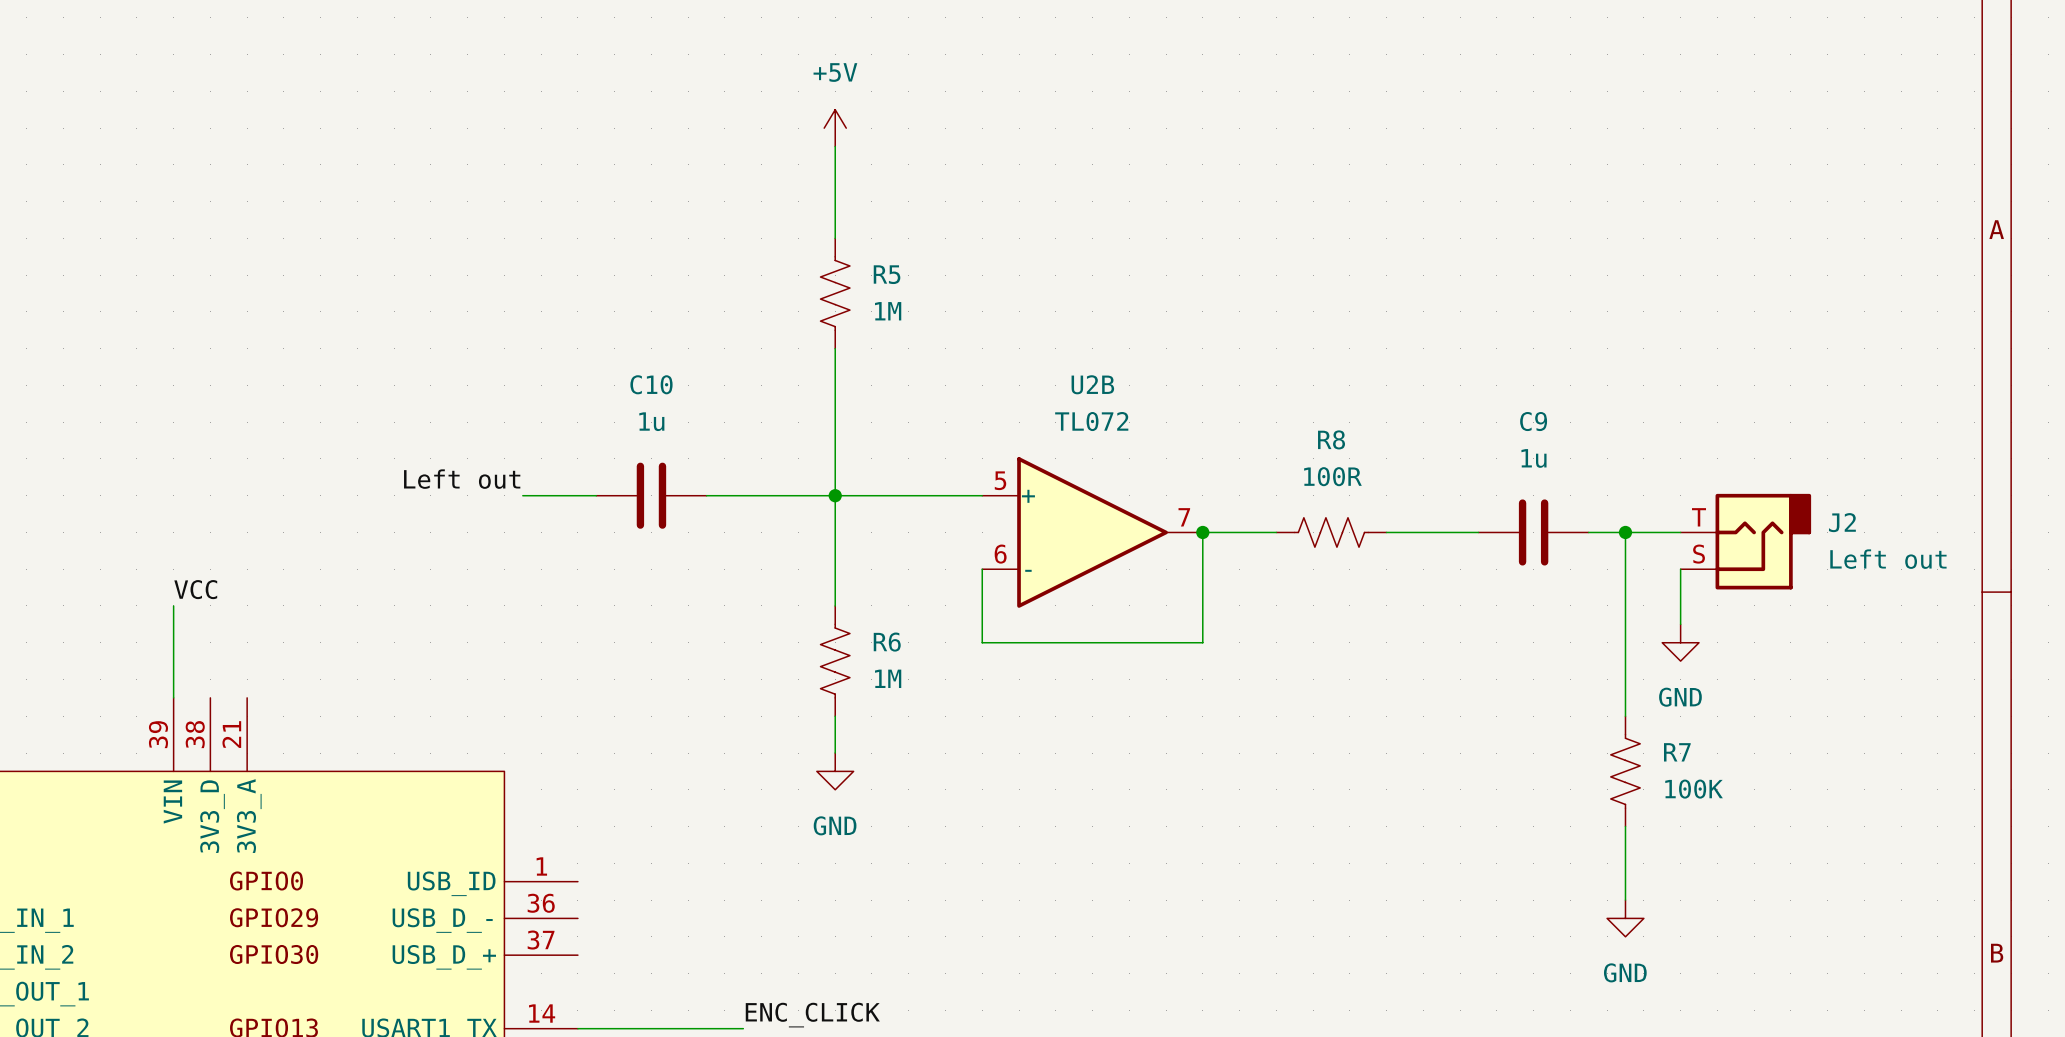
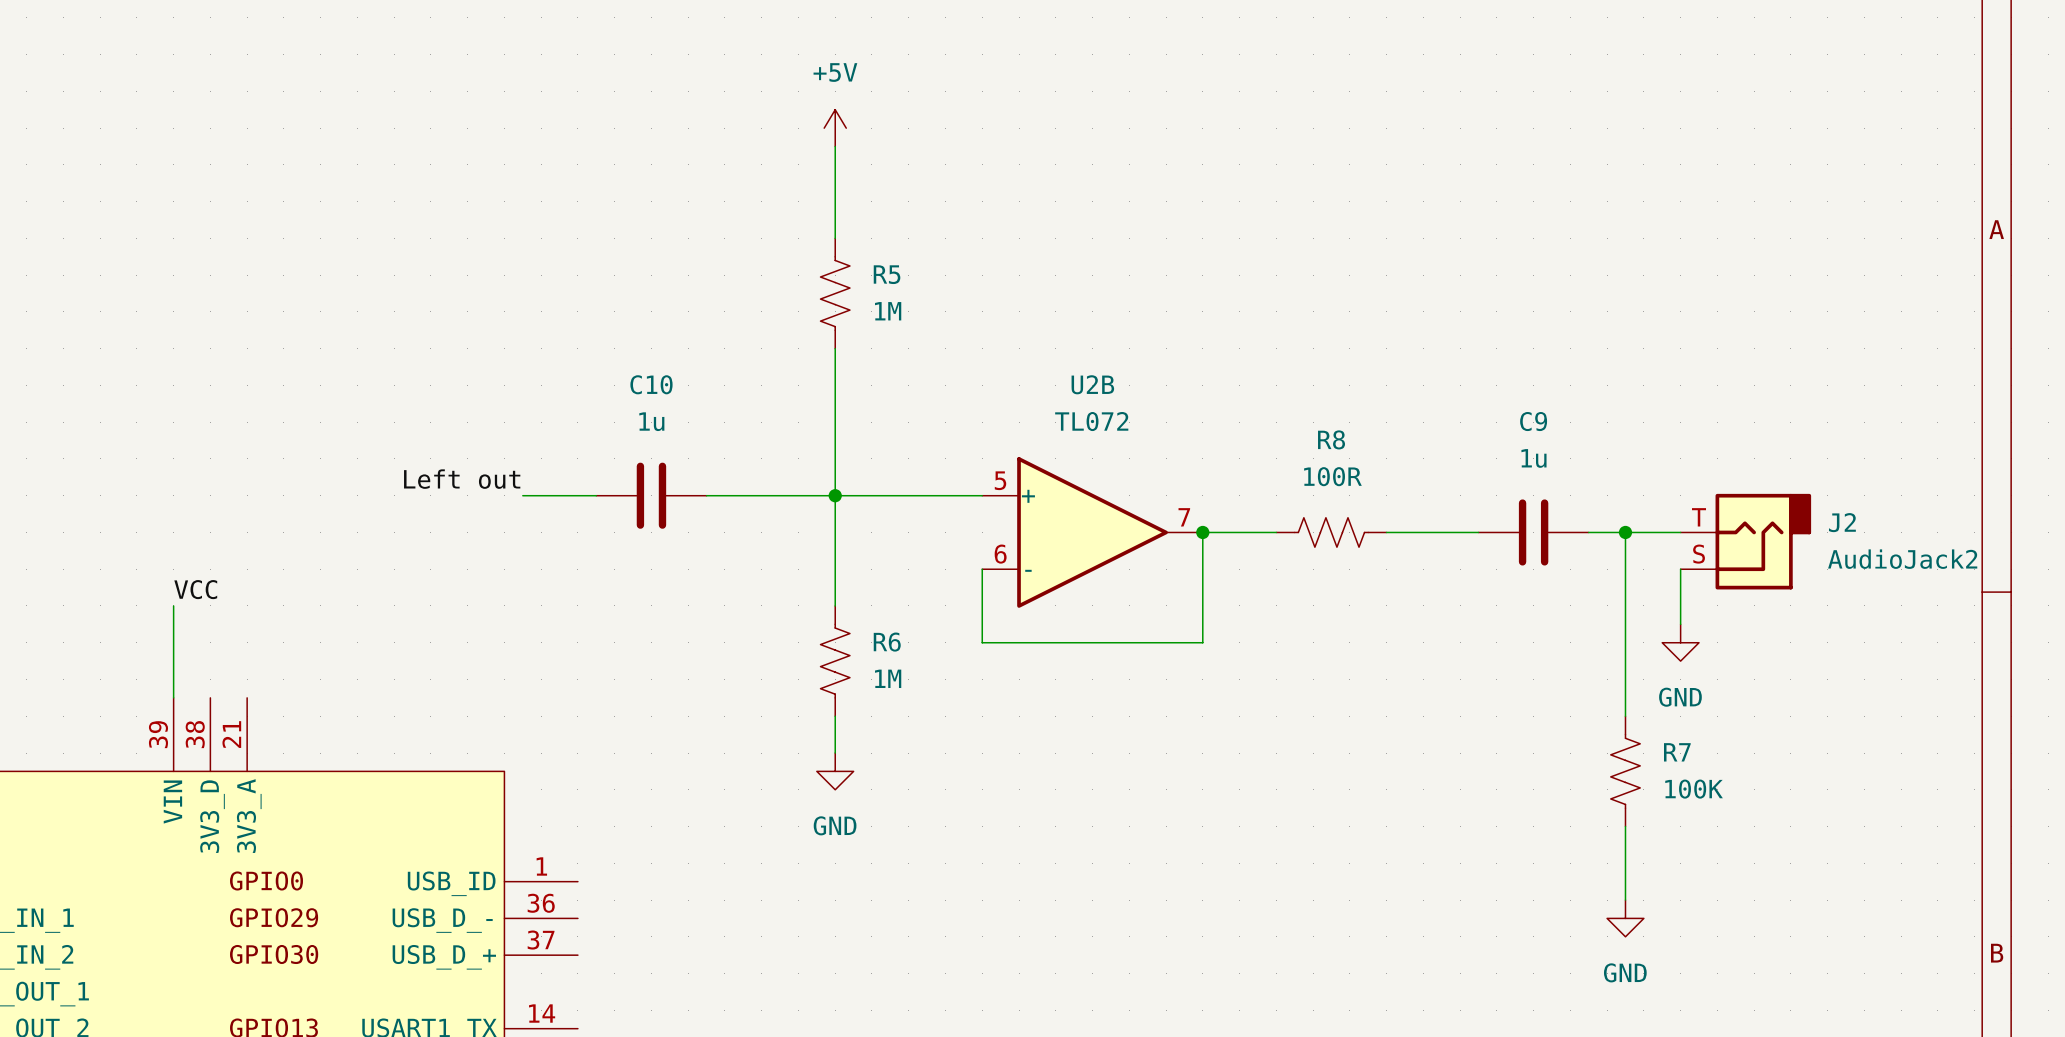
J2 value: Left out (1888, 559) -> AudioJack2 (1902, 559)
label: ENC_CLICK (812, 1015) -> none
wire: (577, 1028) (743, 1028) -> none

